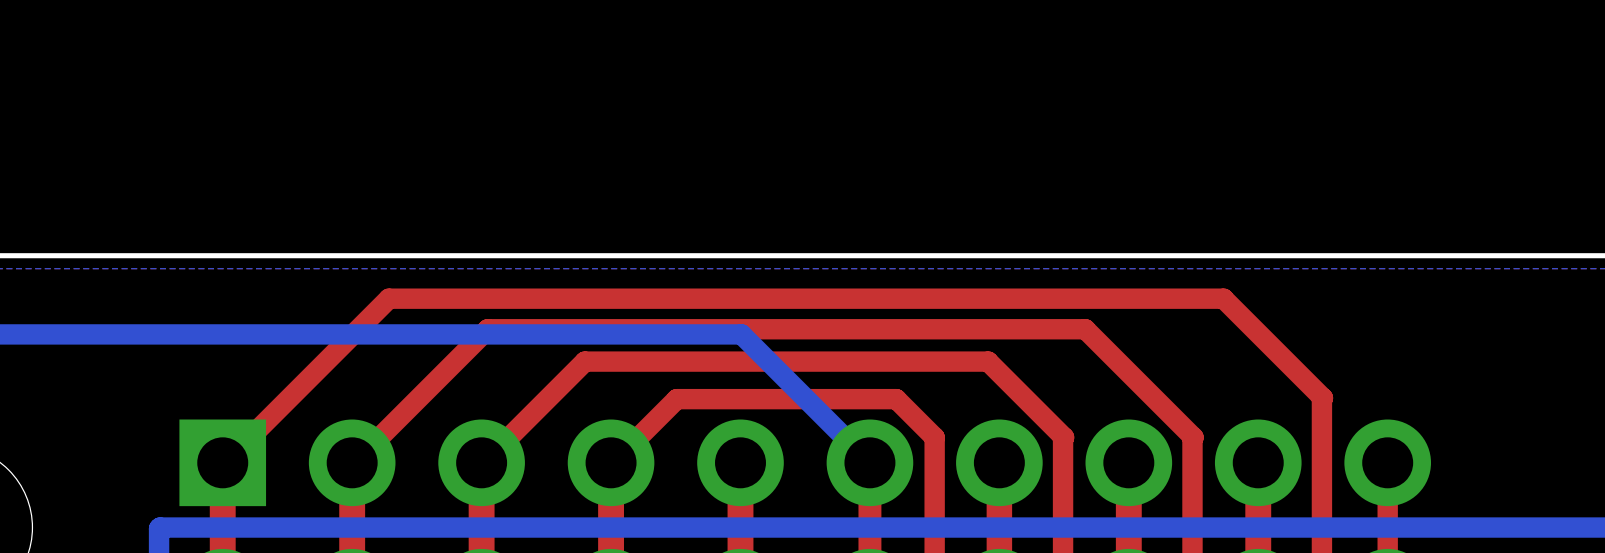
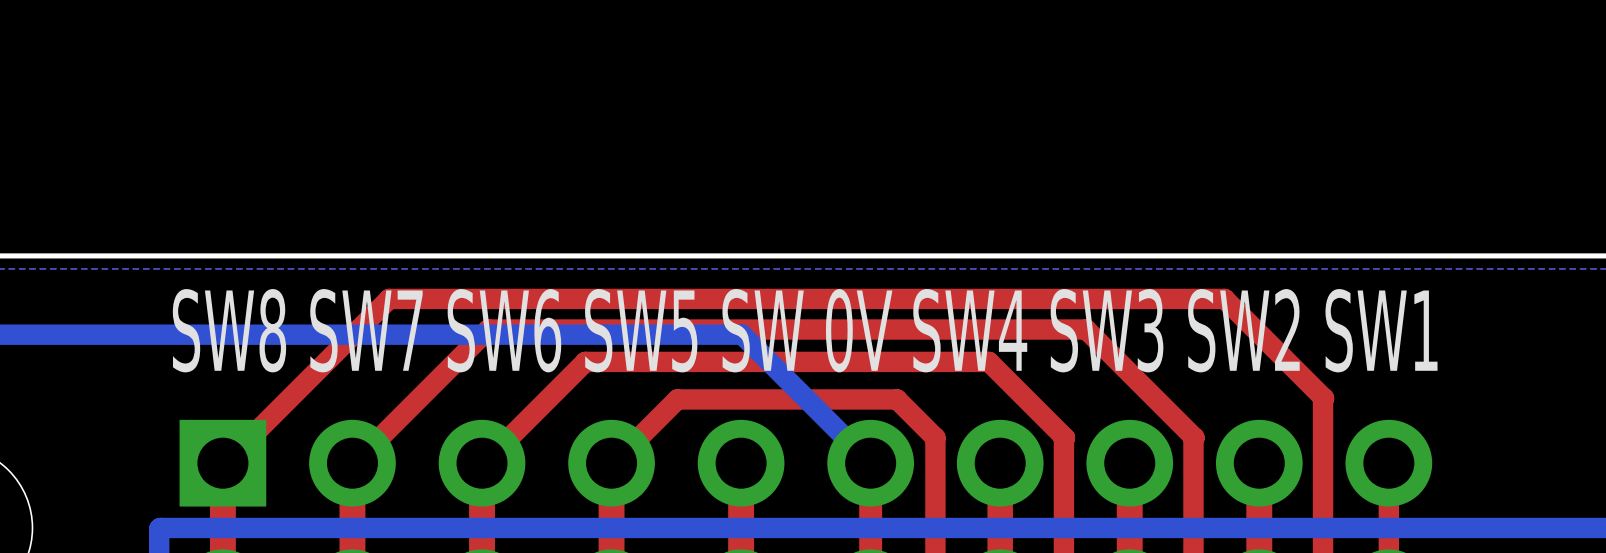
text: none -> SW8 SW7 SW6 SW5 SW 0V SW4 SW3 SW2 SW1 (805, 330)

